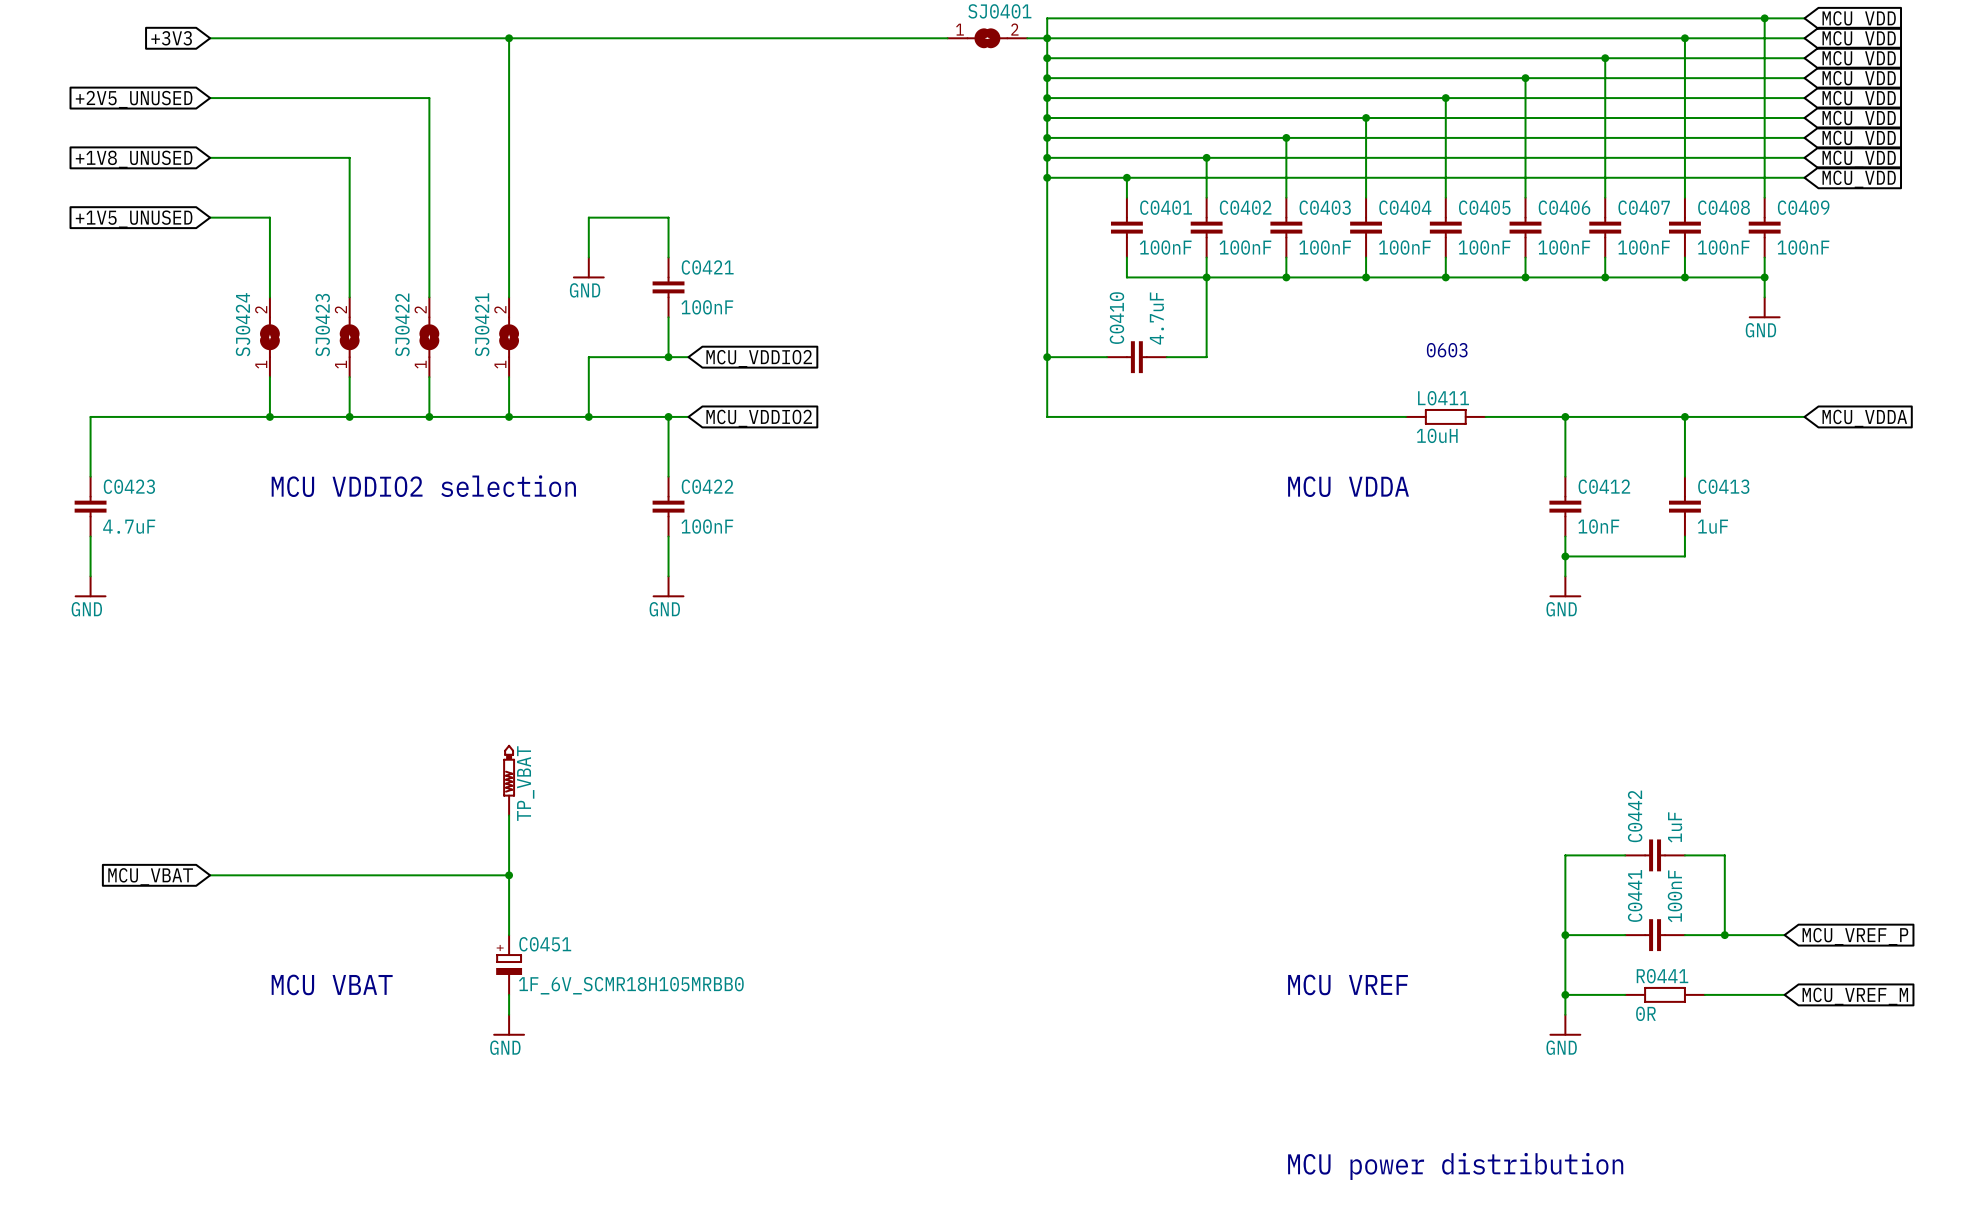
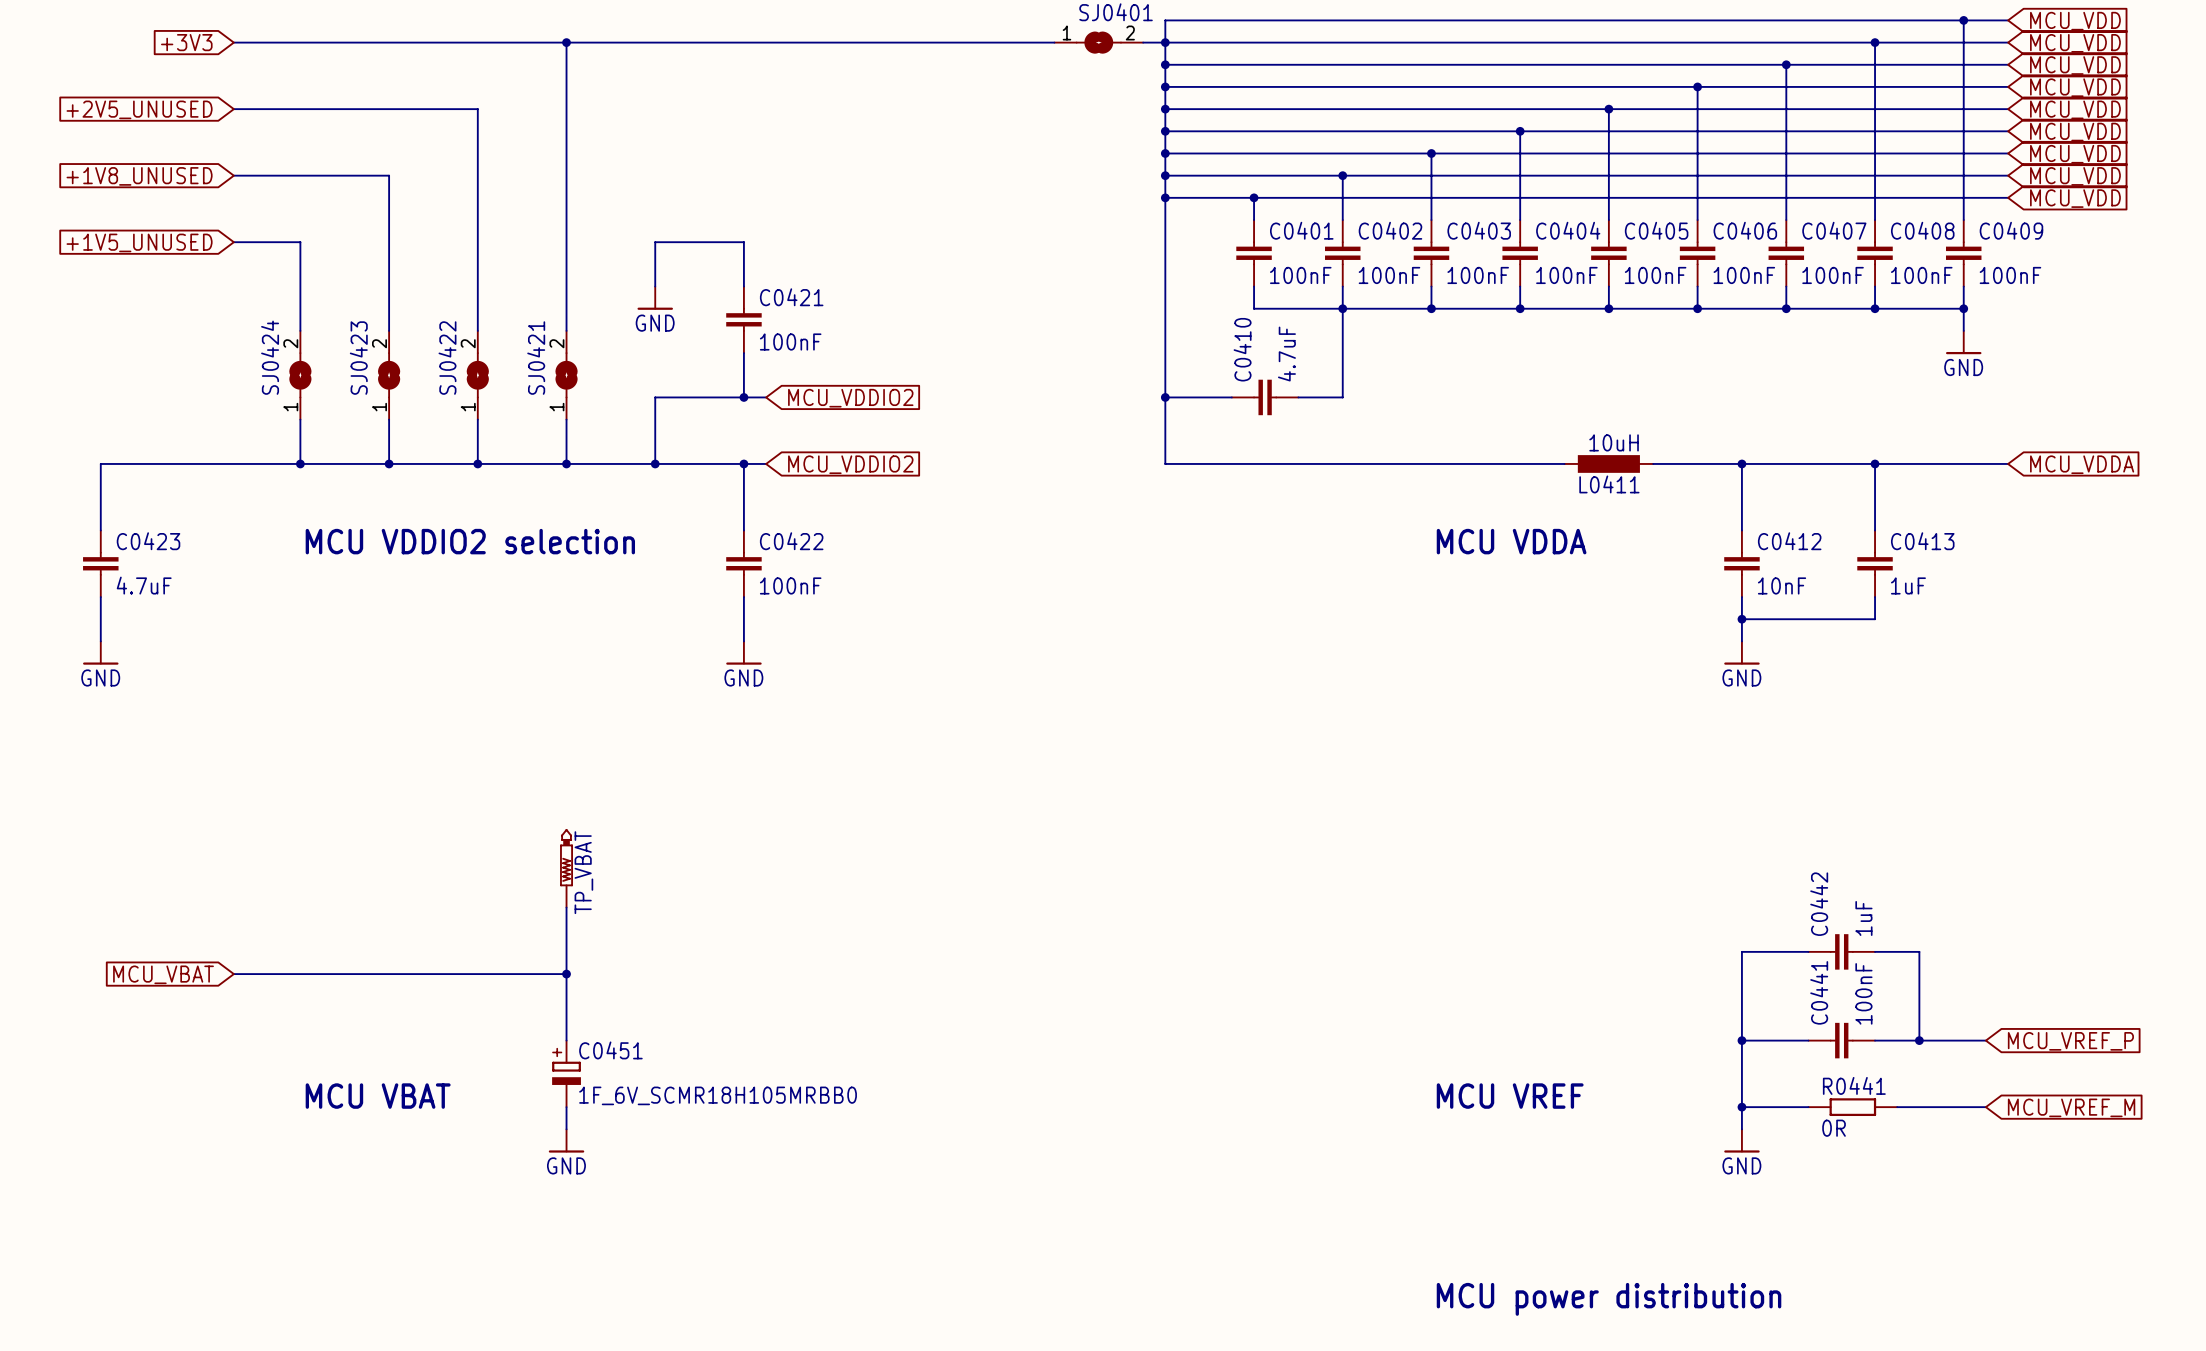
text: 0603 (1447, 350) -> none
L0411 name position: L0411 (1443, 398) -> L0411 (1609, 484)
L0411 symbol: [1405, 408, 1486, 425] -> [1564, 455, 1654, 473]
L0411 value position: 10uH (1437, 435) -> 10uH (1614, 442)

